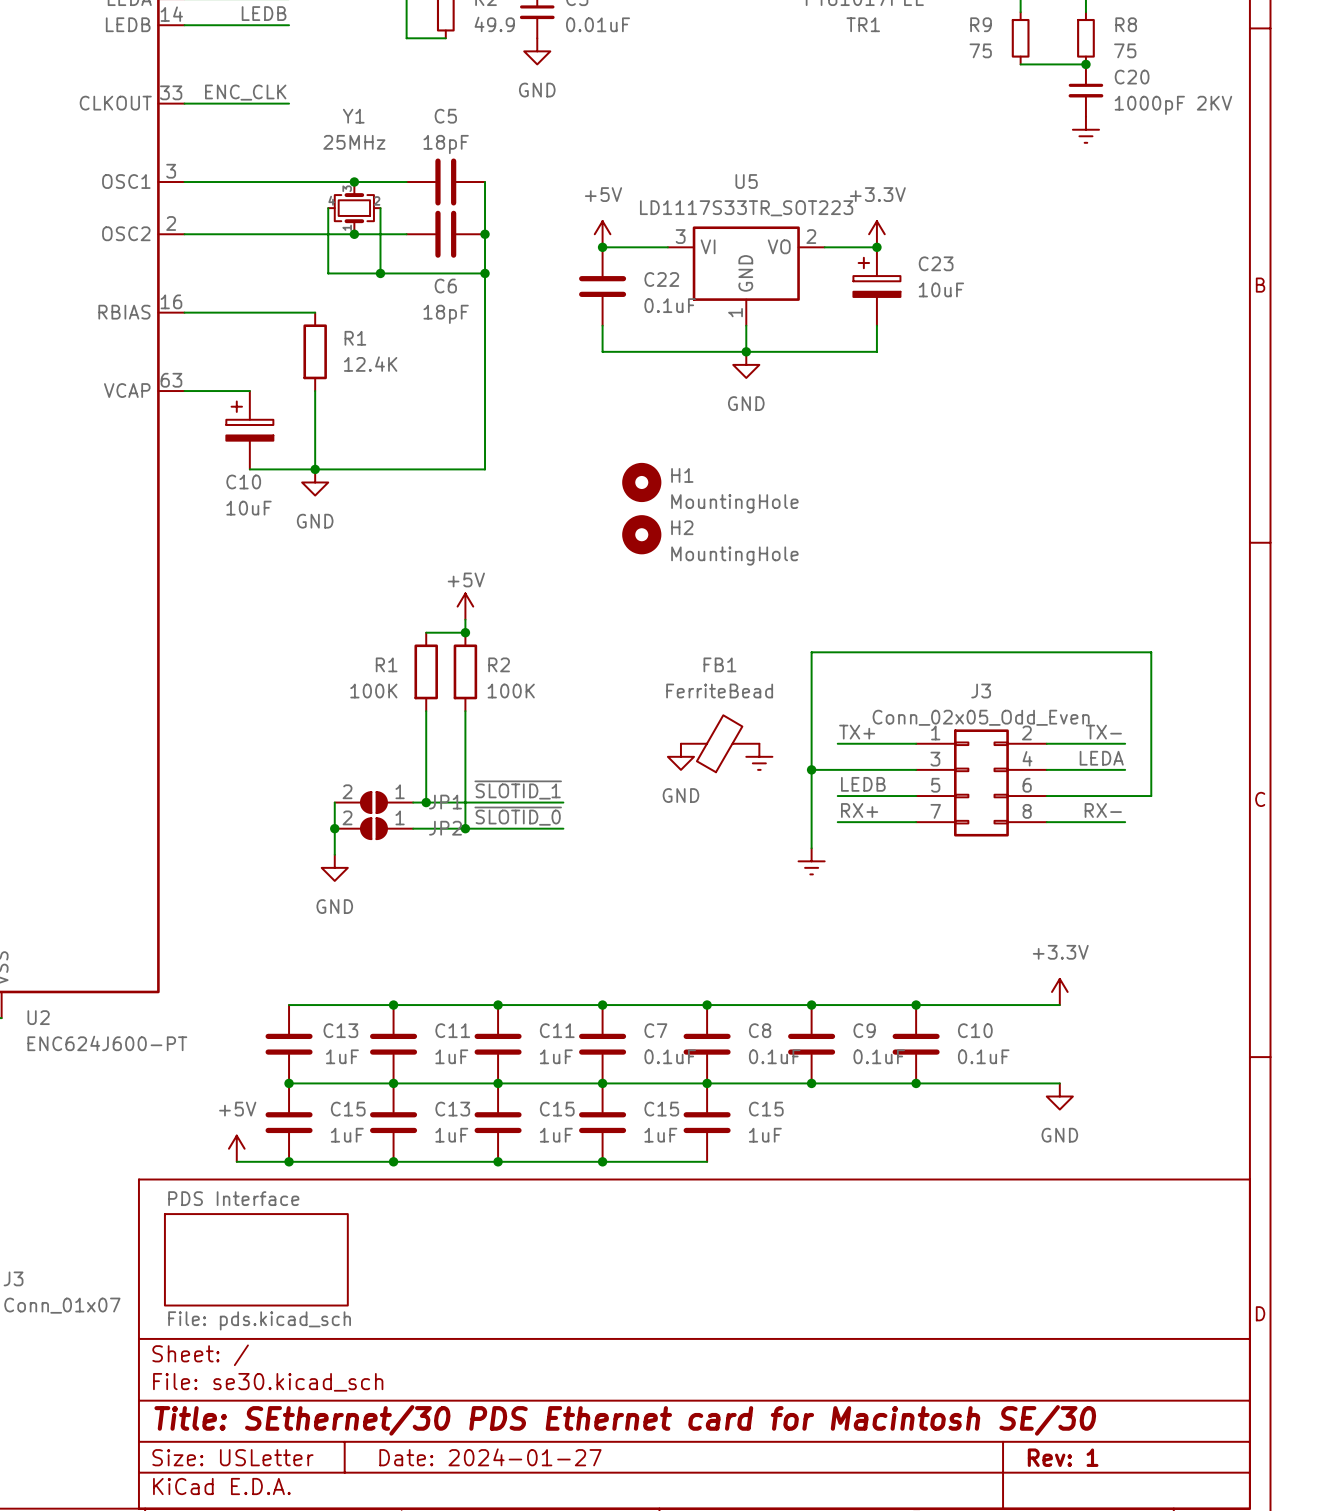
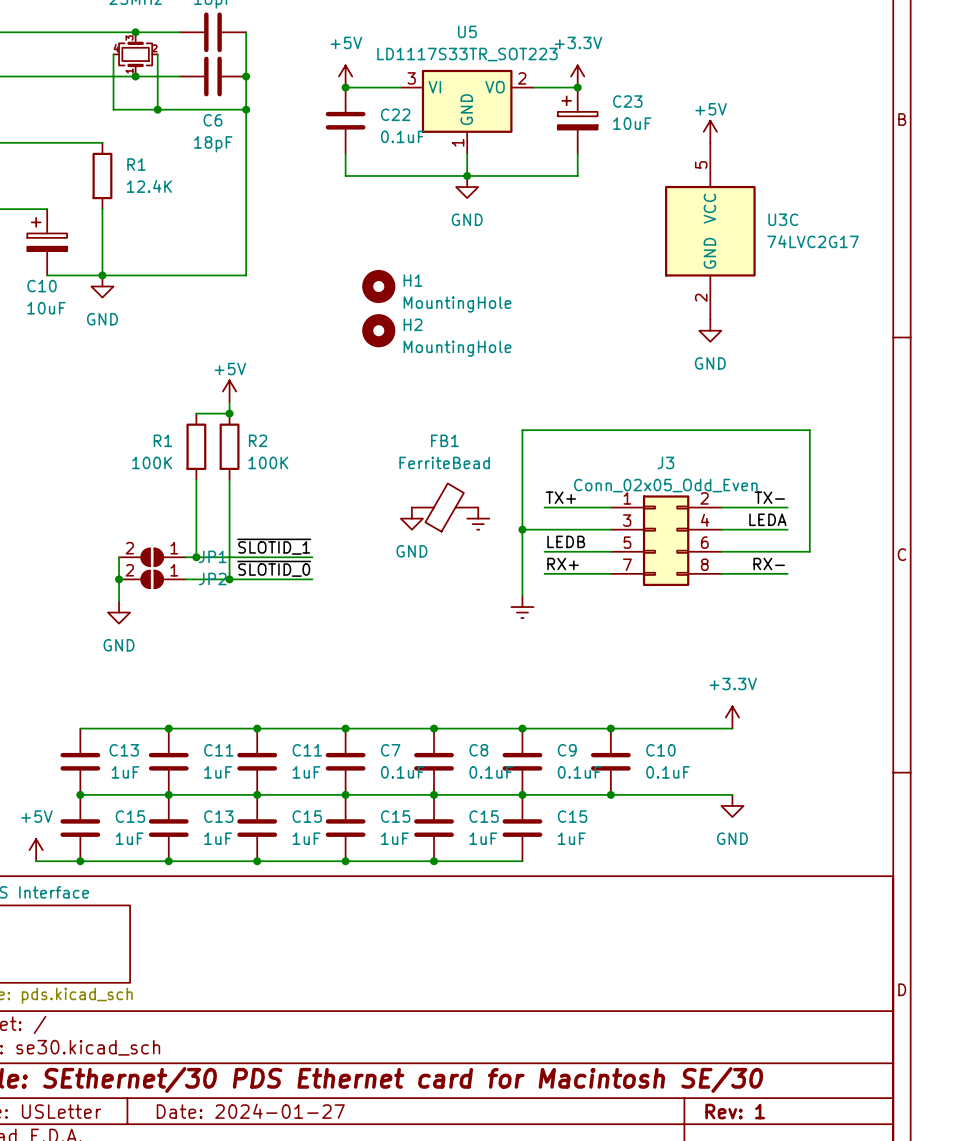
power symbol: none -> +5V (710, 131)
U3C: none -> 74LVC2G17 (710, 231)
power symbol: none -> GND (710, 330)
C15: none -> 1uF (522, 828)
wire: none -> (434, 861) (522, 861)
junction: none -> (434, 861)

